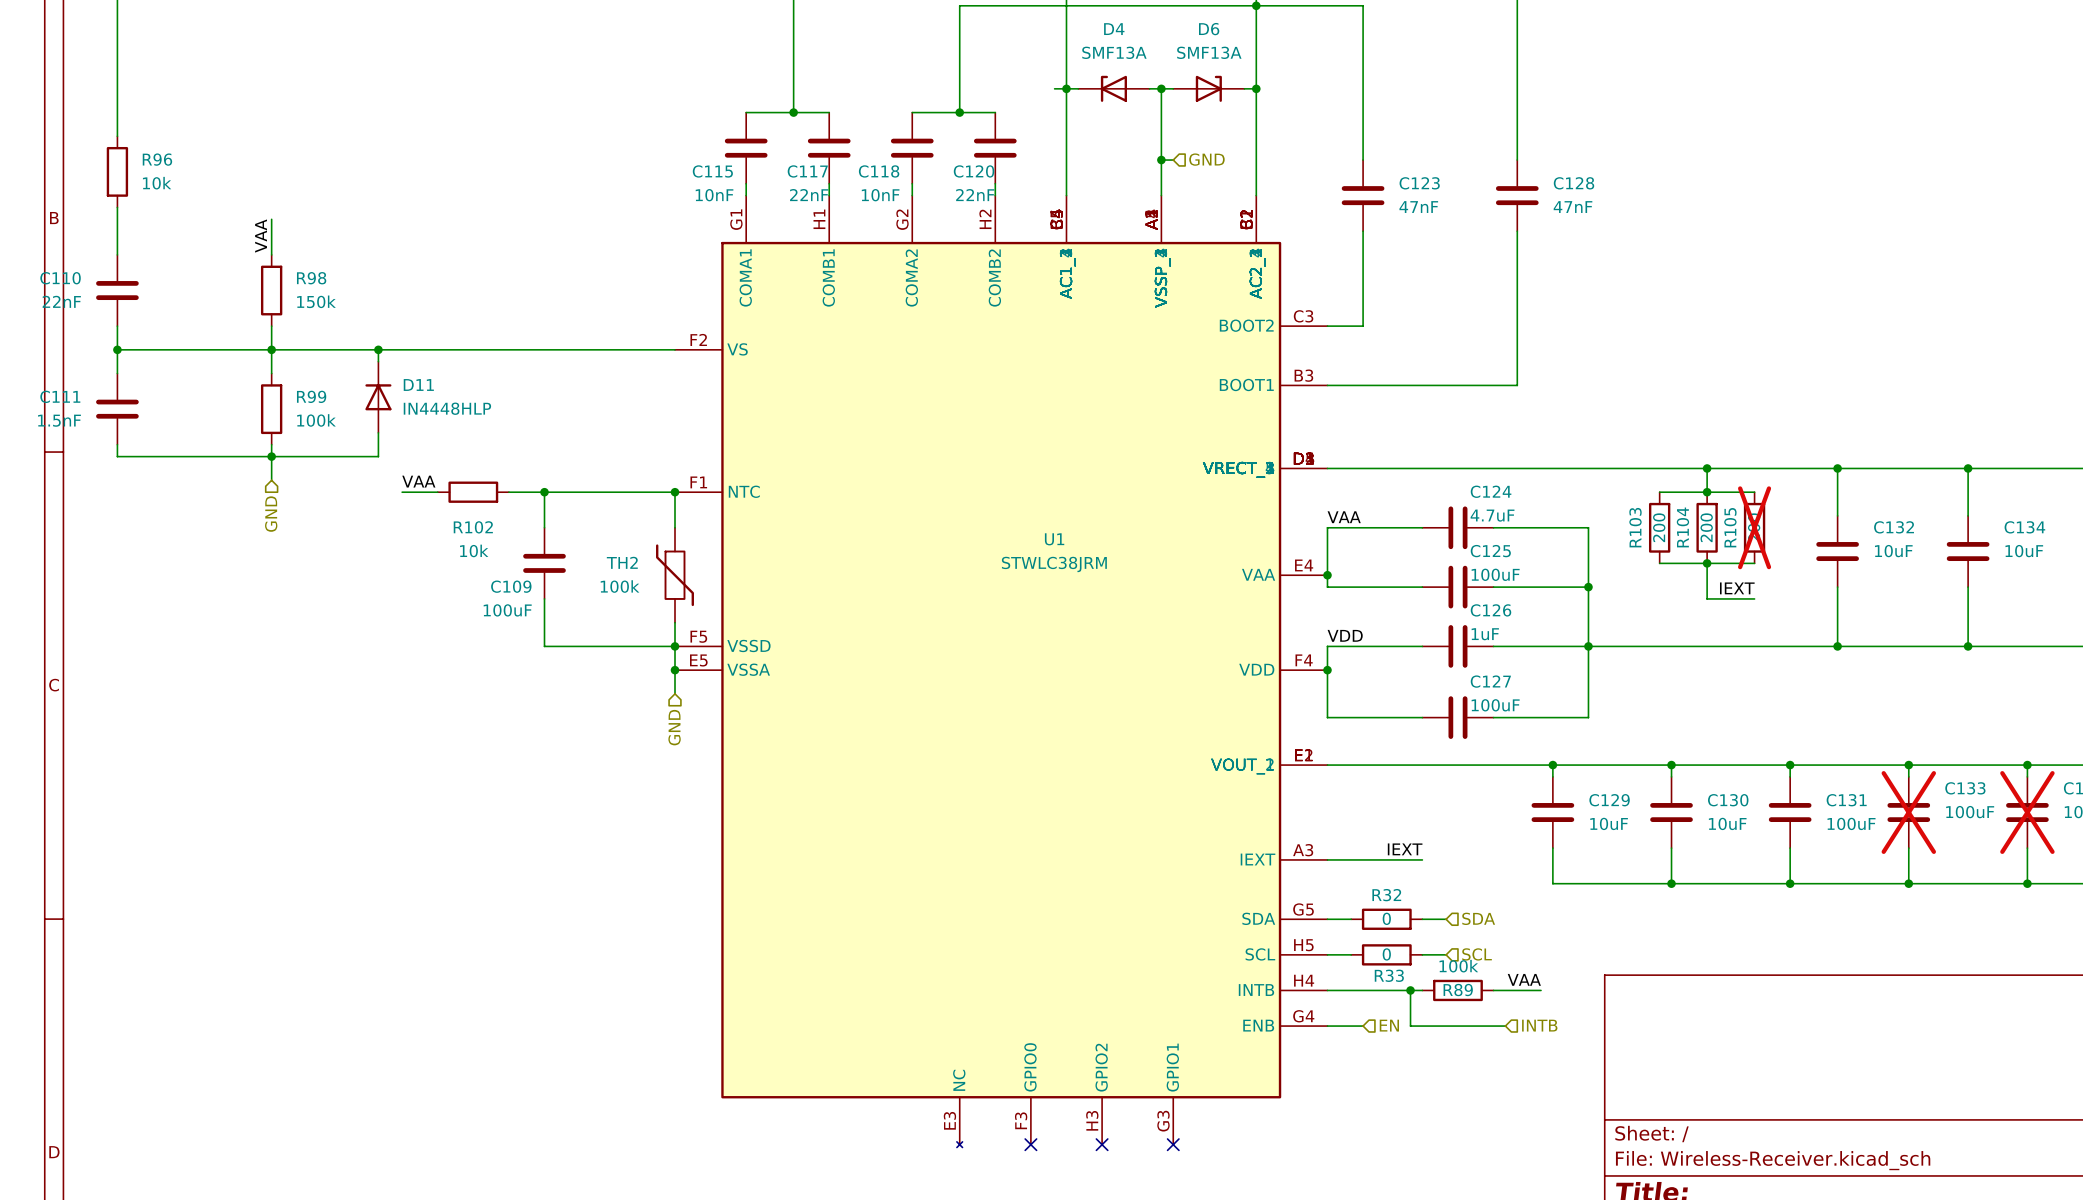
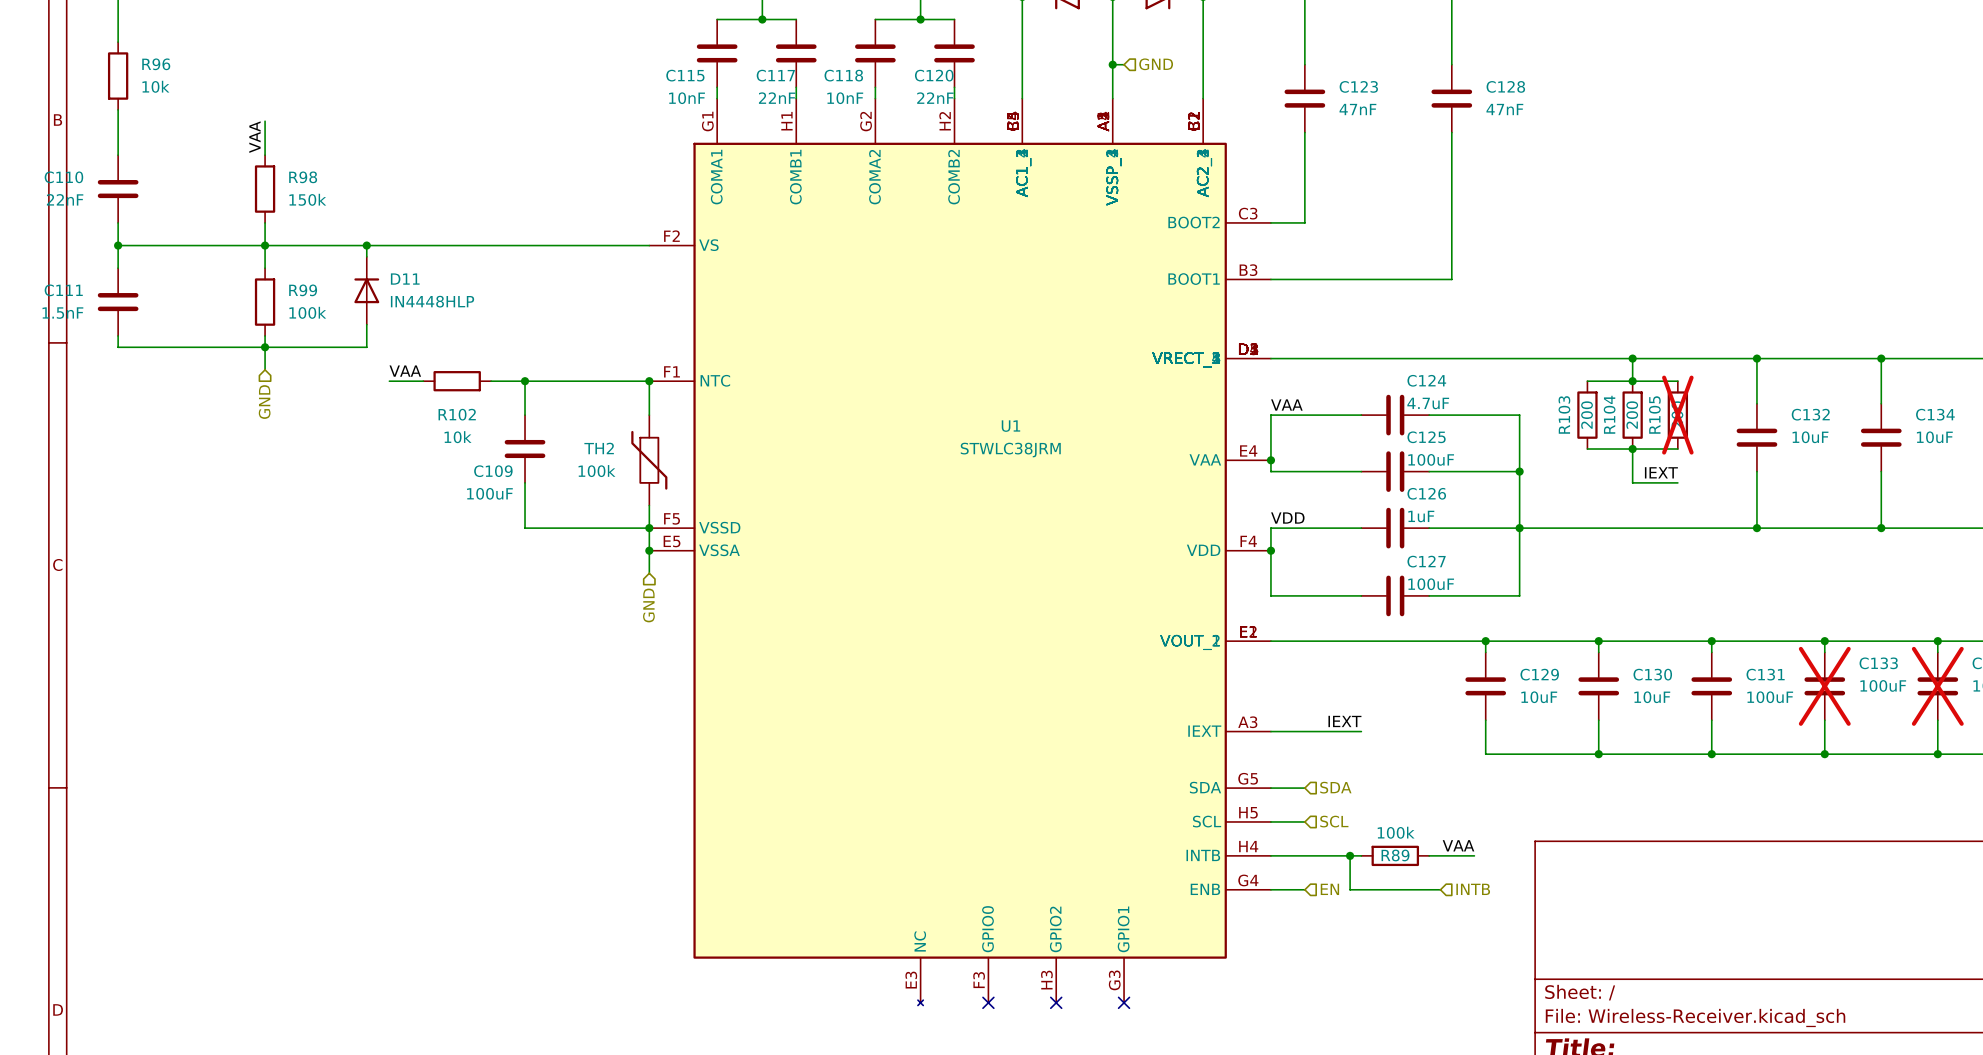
hierarchical label position: SDA (1478, 918) -> SDA (1335, 787)
R32: 0 (1386, 919) -> none
wire: (1422, 919) (1446, 919) -> none
R33: 0 (1386, 954) -> none
wire: (1422, 954) (1446, 954) -> none
hierarchical label position: SCL (1477, 954) -> SCL (1334, 821)

